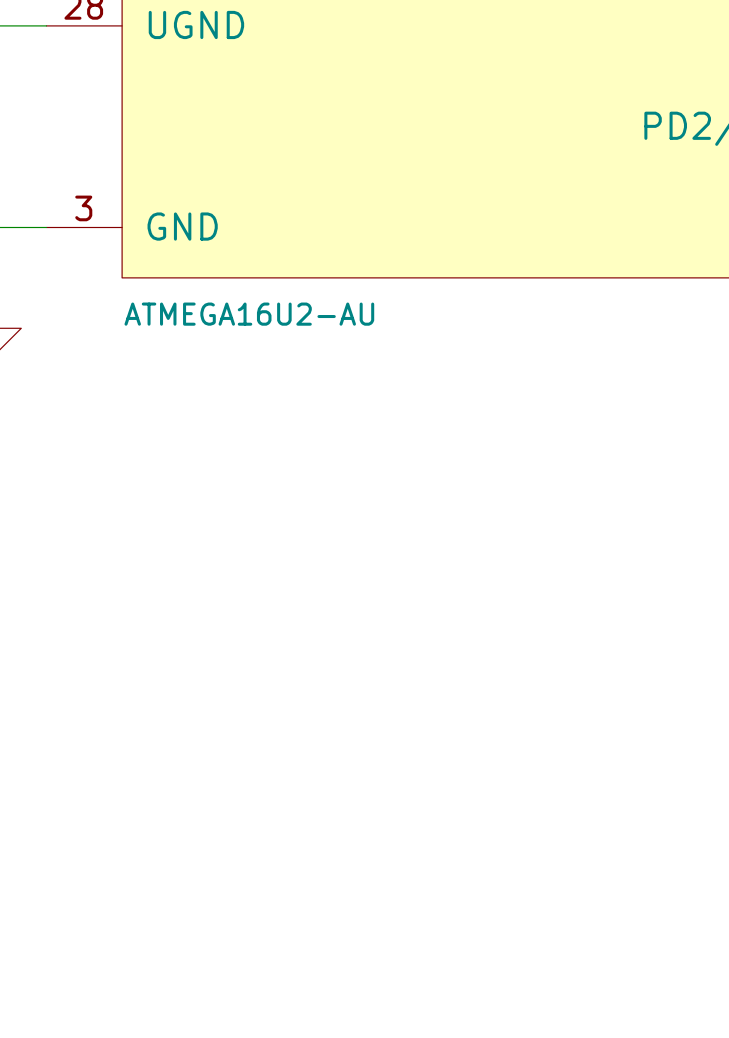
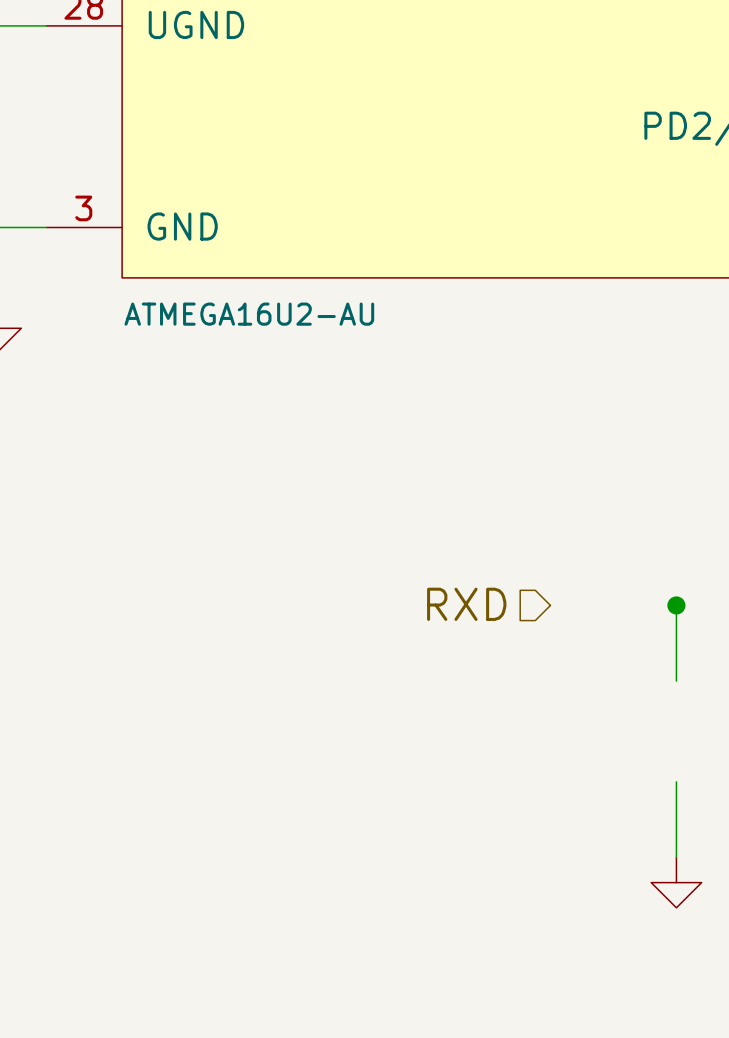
hierarchical label: none -> RXD (466, 604)
wire: none -> (676, 605) (676, 681)
junction: none -> (676, 605)
wire: none -> (676, 781) (676, 857)
power symbol: none -> (676, 882)

